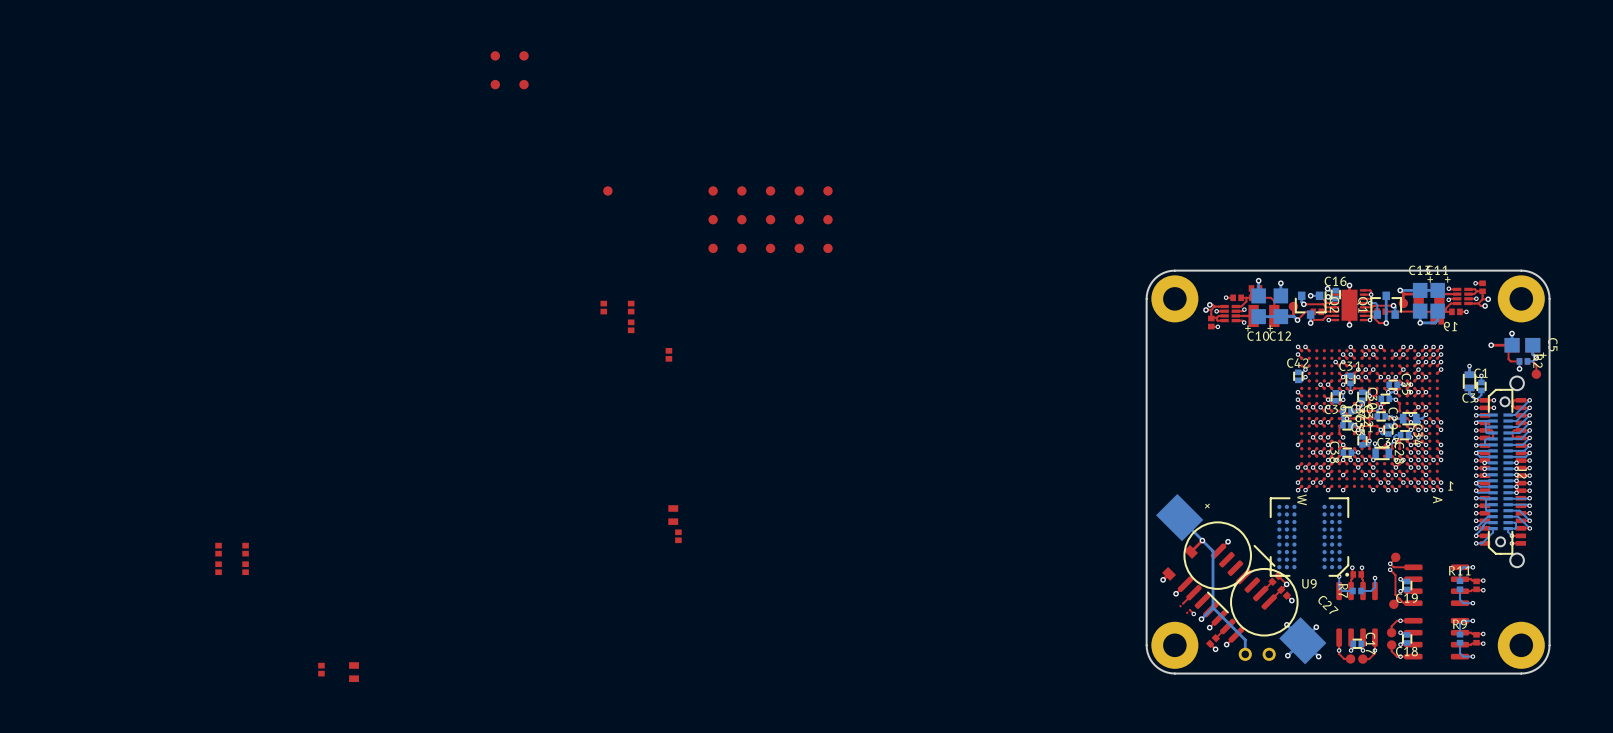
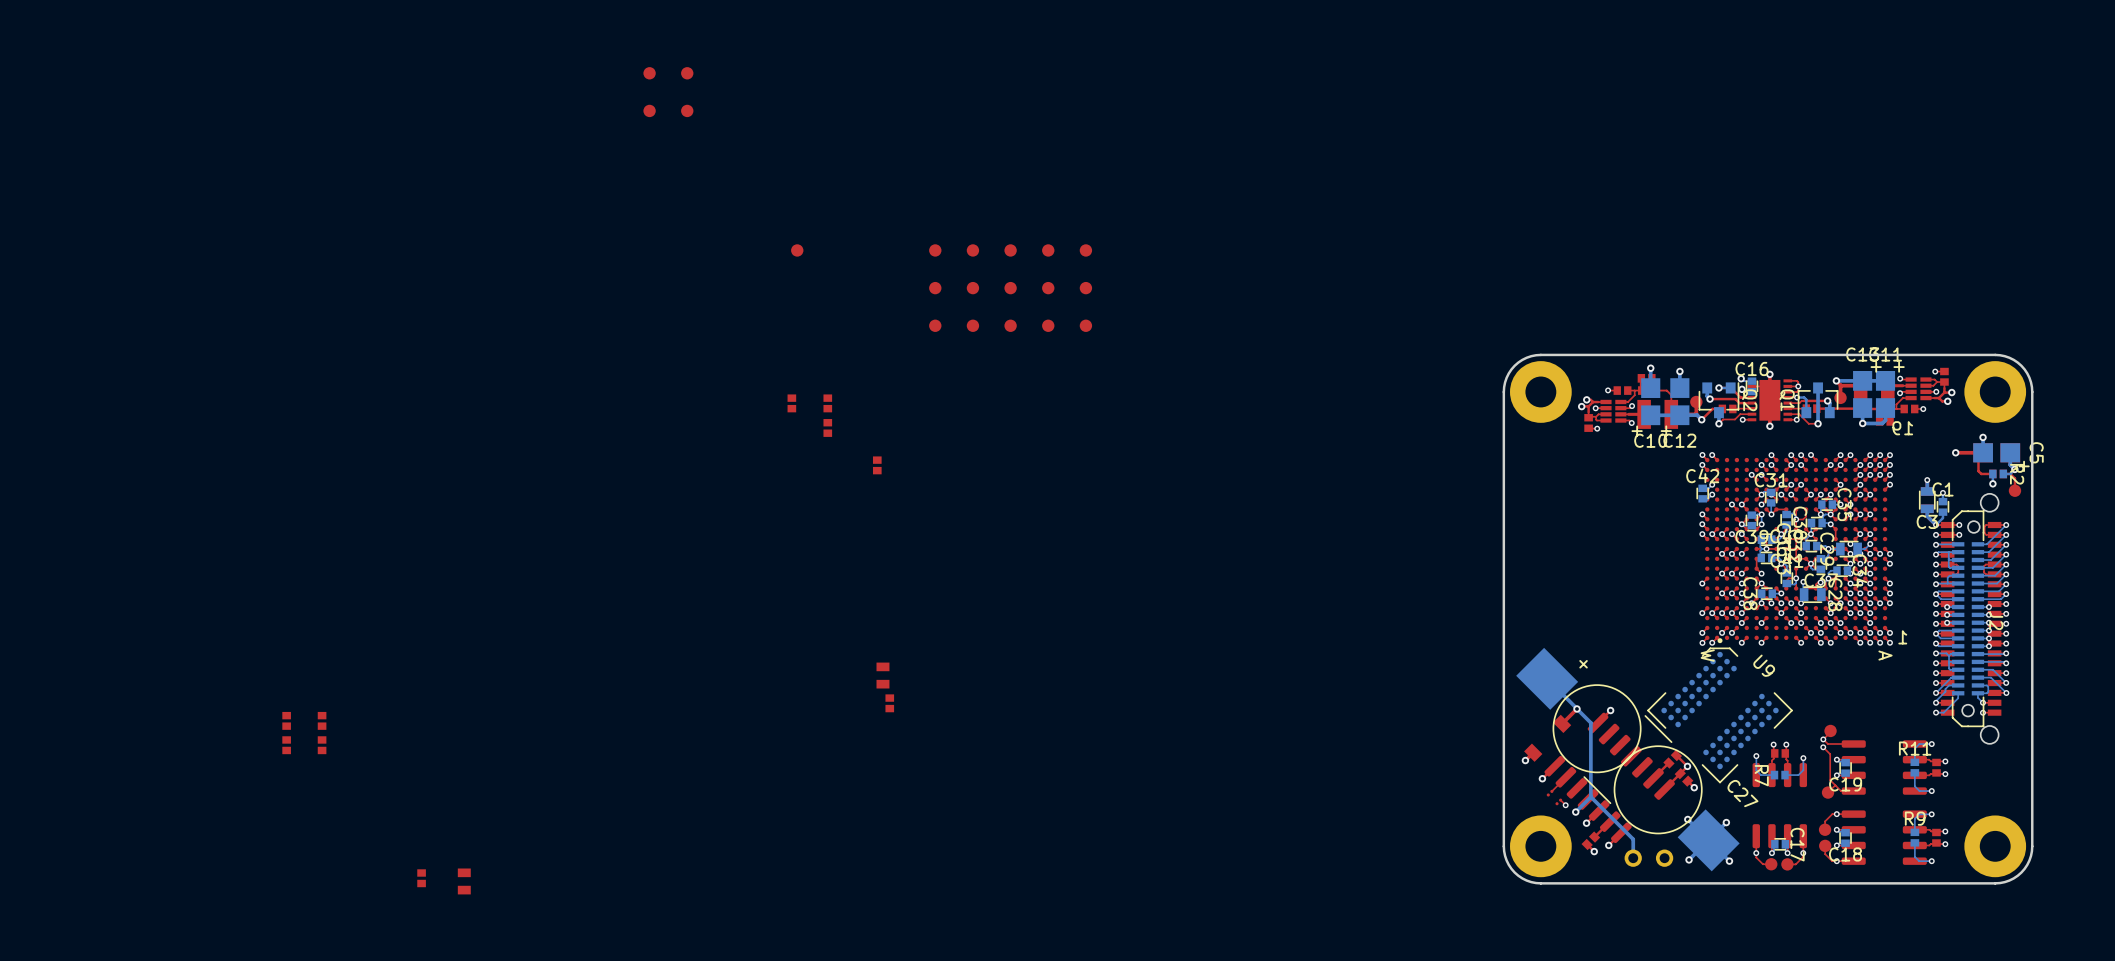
U9 rotation: 0° (1309, 537) -> 135° counterclockwise (1720, 710)

